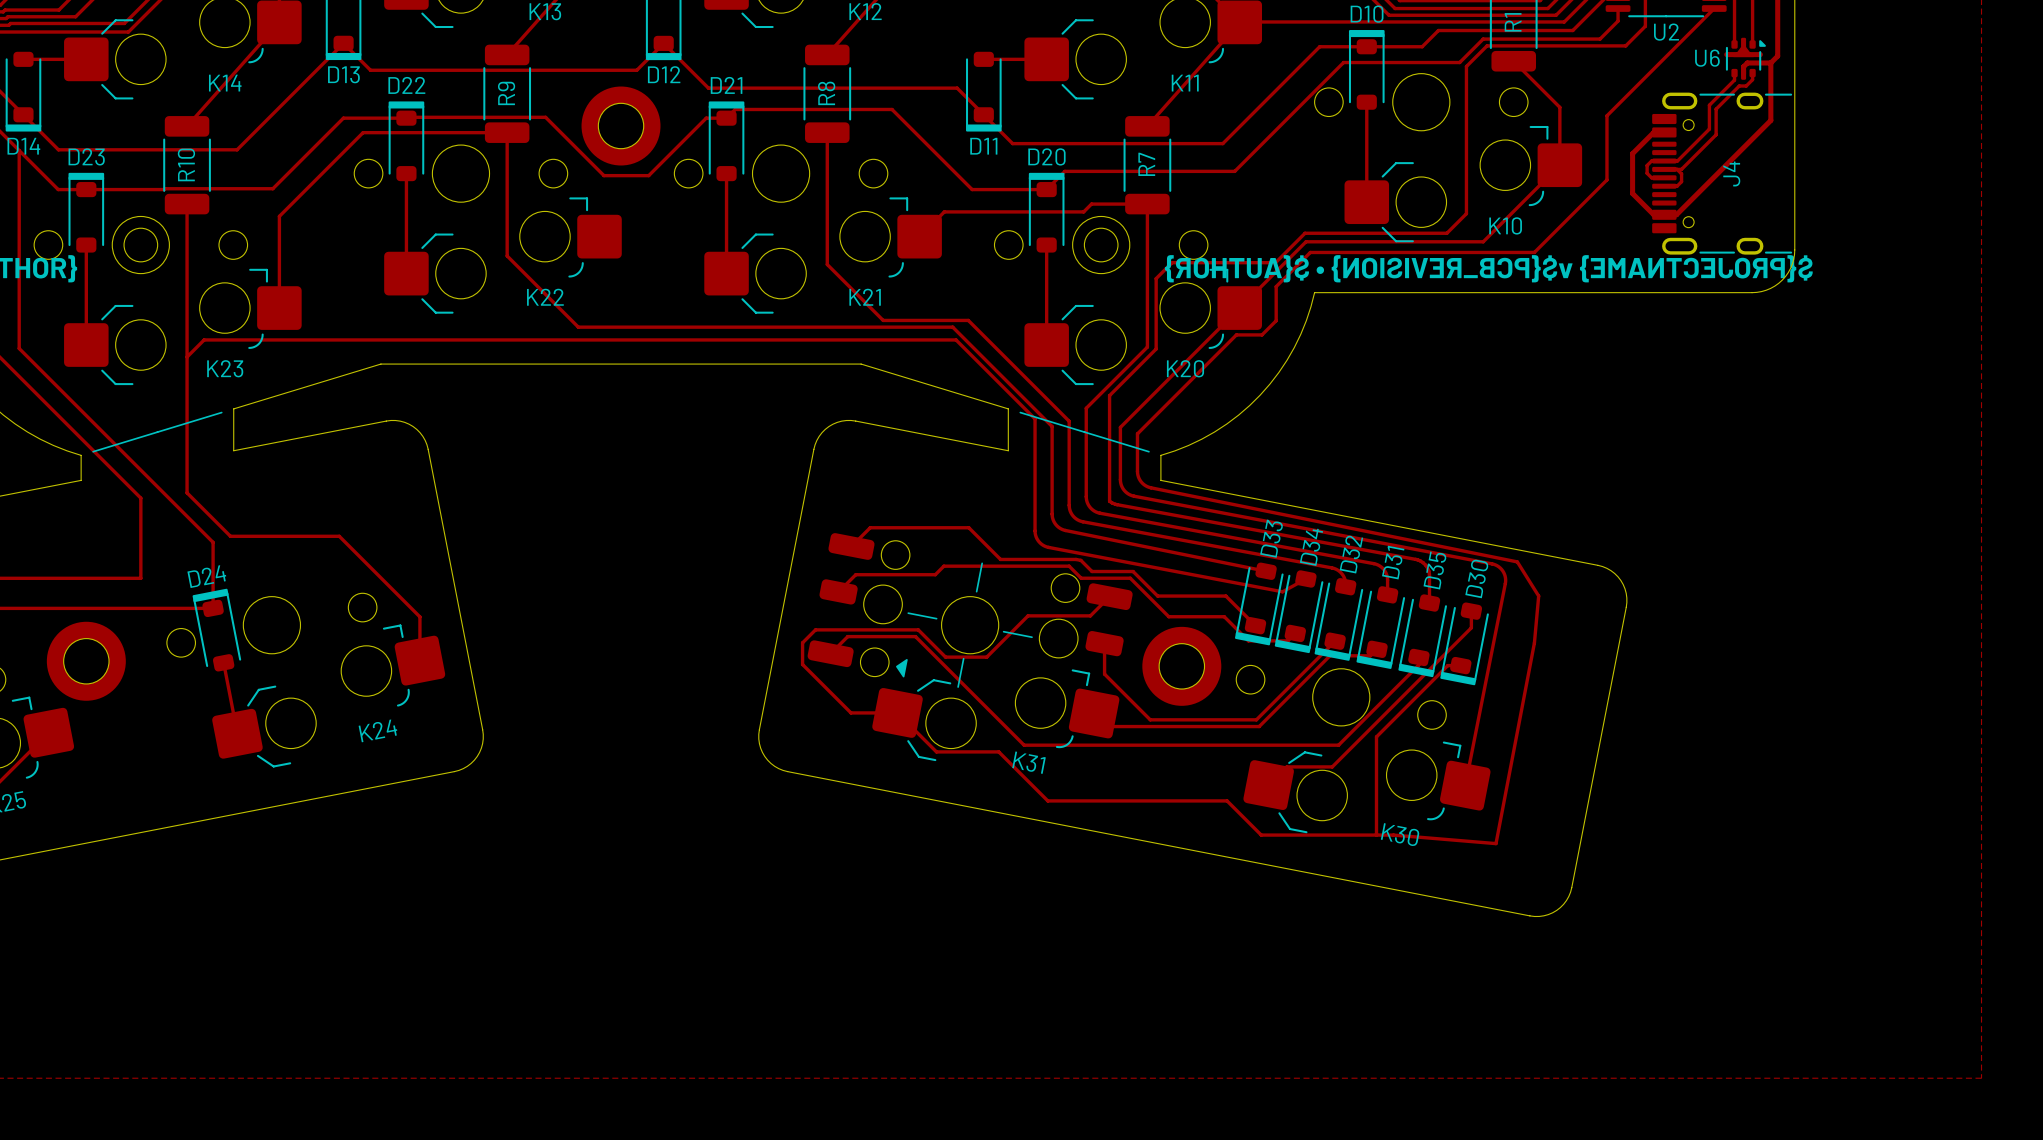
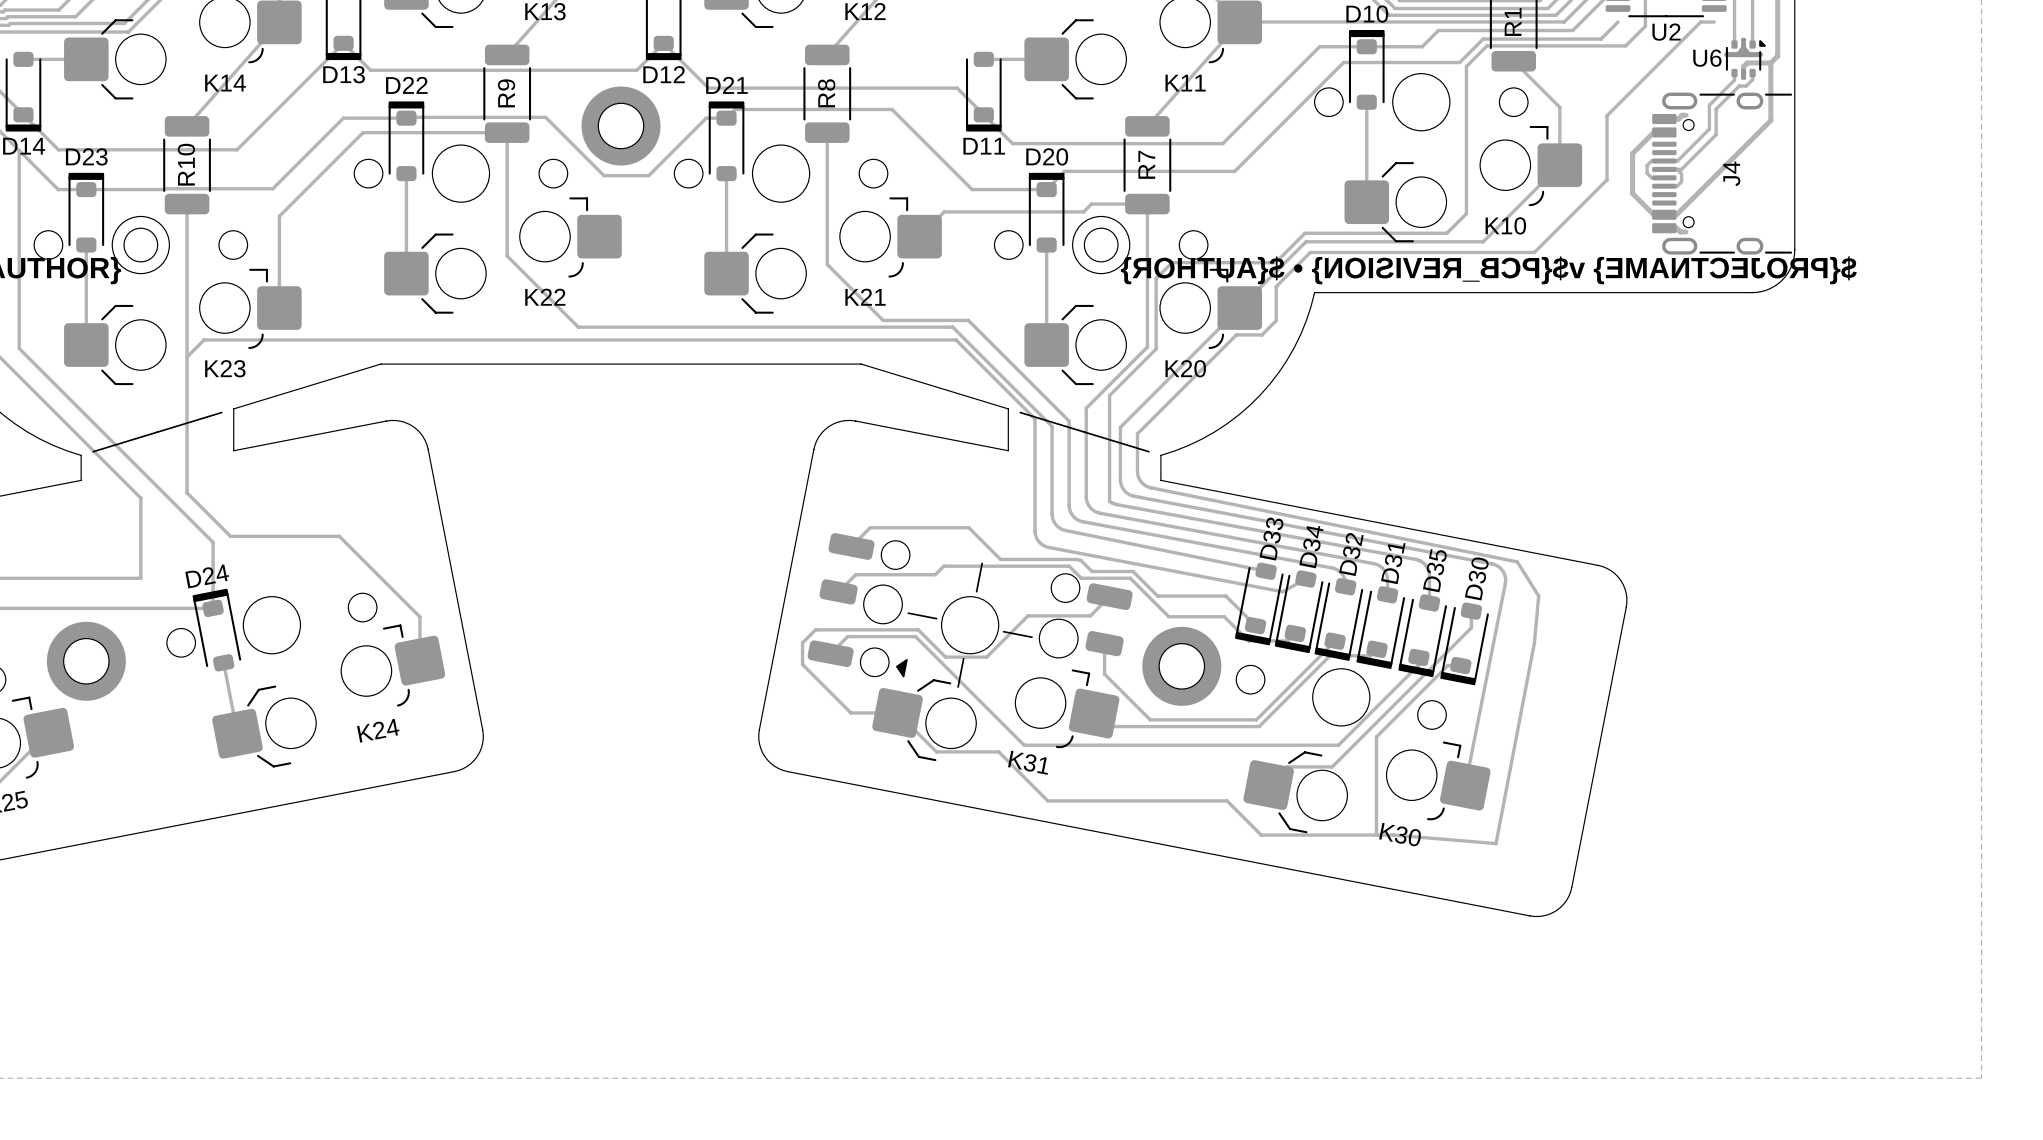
track: (1618, 8) (1618, 21) (1600, 39) -> (1618, 22) (1600, 39)
track: (1714, 8) (1700, 22) -> (1714, 22) (1700, 22)
track: none -> (1685, 115) (1682, 115) (1678, 119) (1664, 119)
track: none -> (1664, 228) (1676, 228) (1680, 231) (1685, 231)

